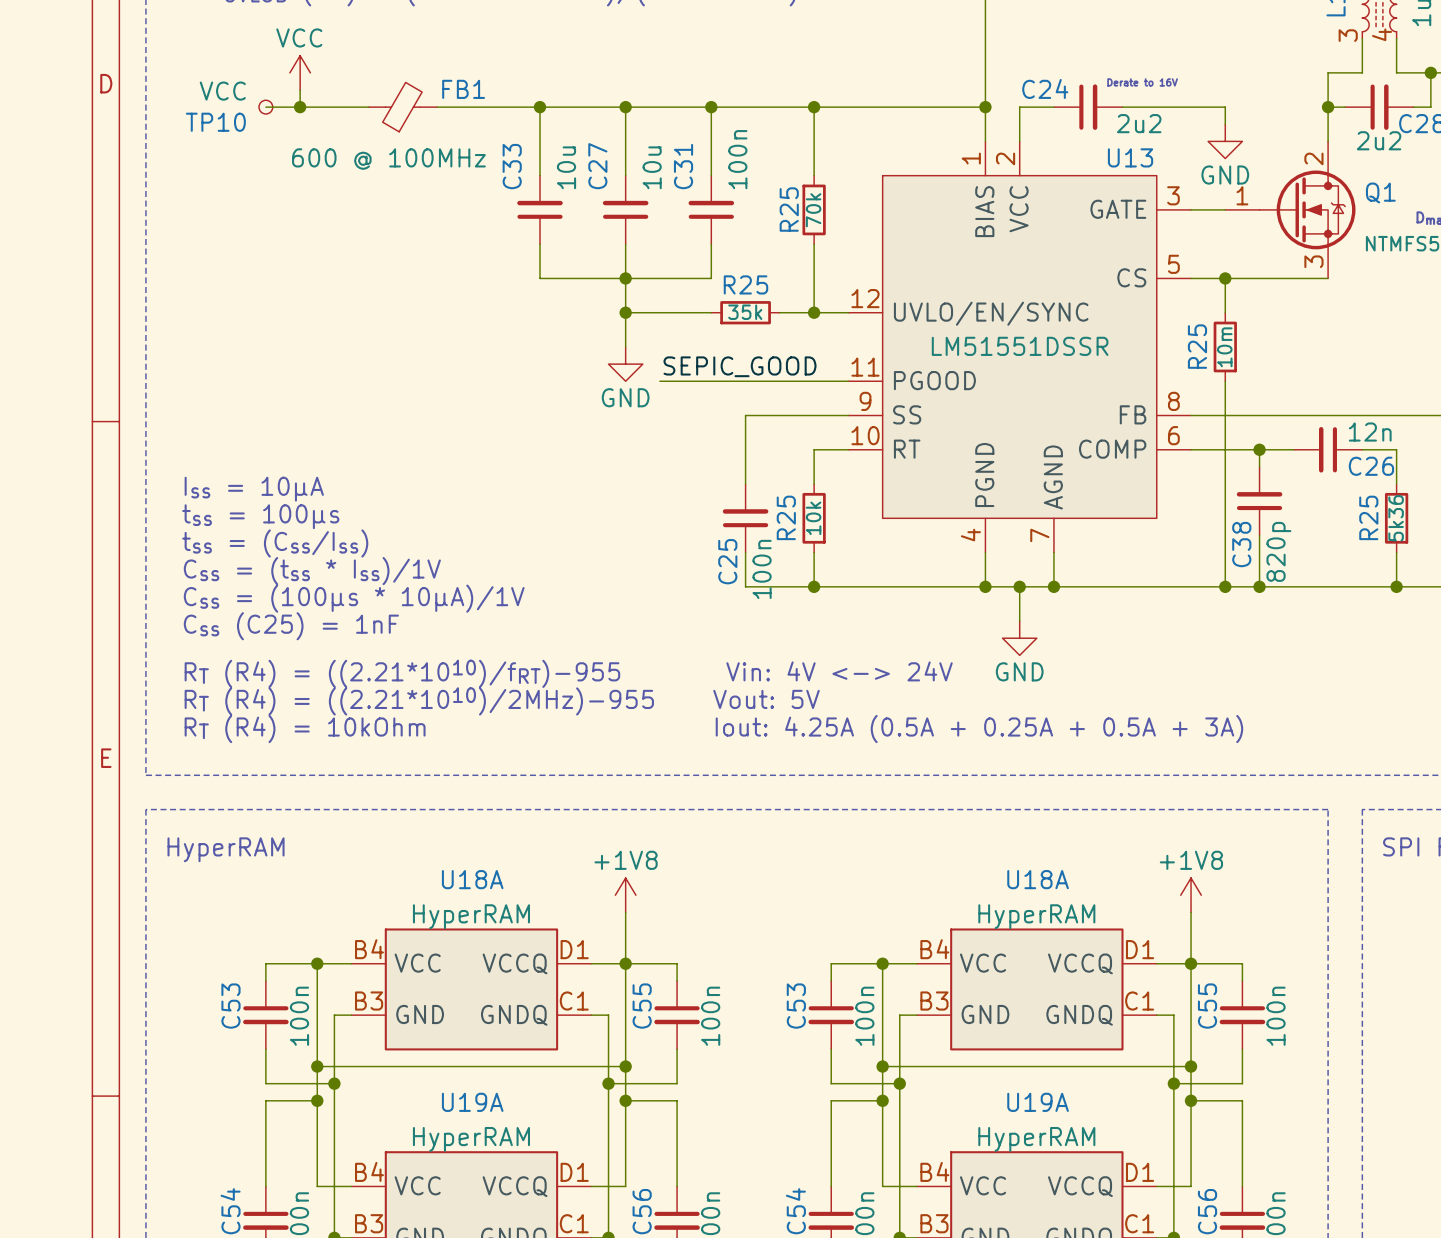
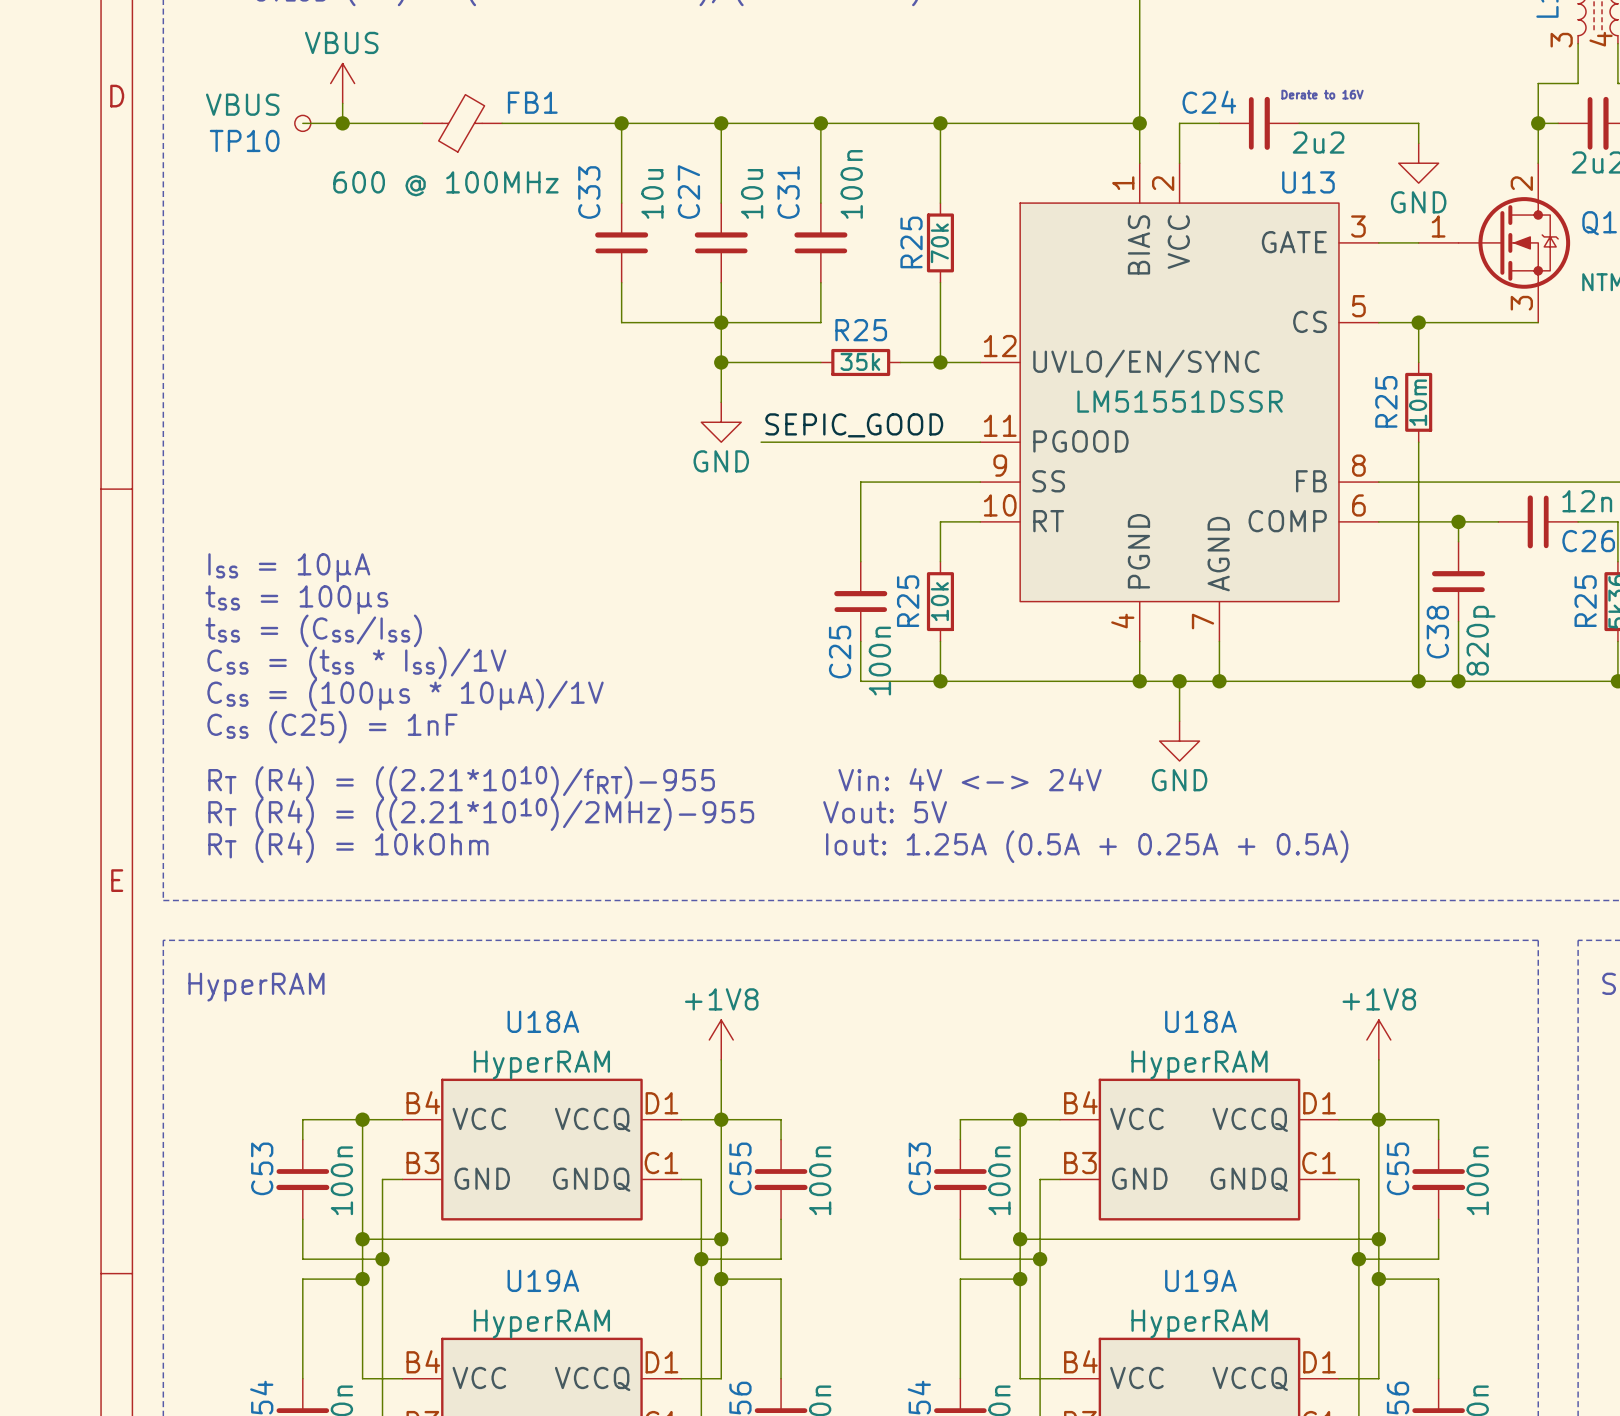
power symbol: VCC (300, 72) -> VBUS (342, 83)
TP10 value: VCC (222, 91) -> VBUS (242, 104)
text: Iout: 4.25A (0.5A + 0.25A + 0.5A + 3A) (979, 729) -> Iout: 1.25A (0.5A + 0.25A + 0.5A) (1087, 846)

